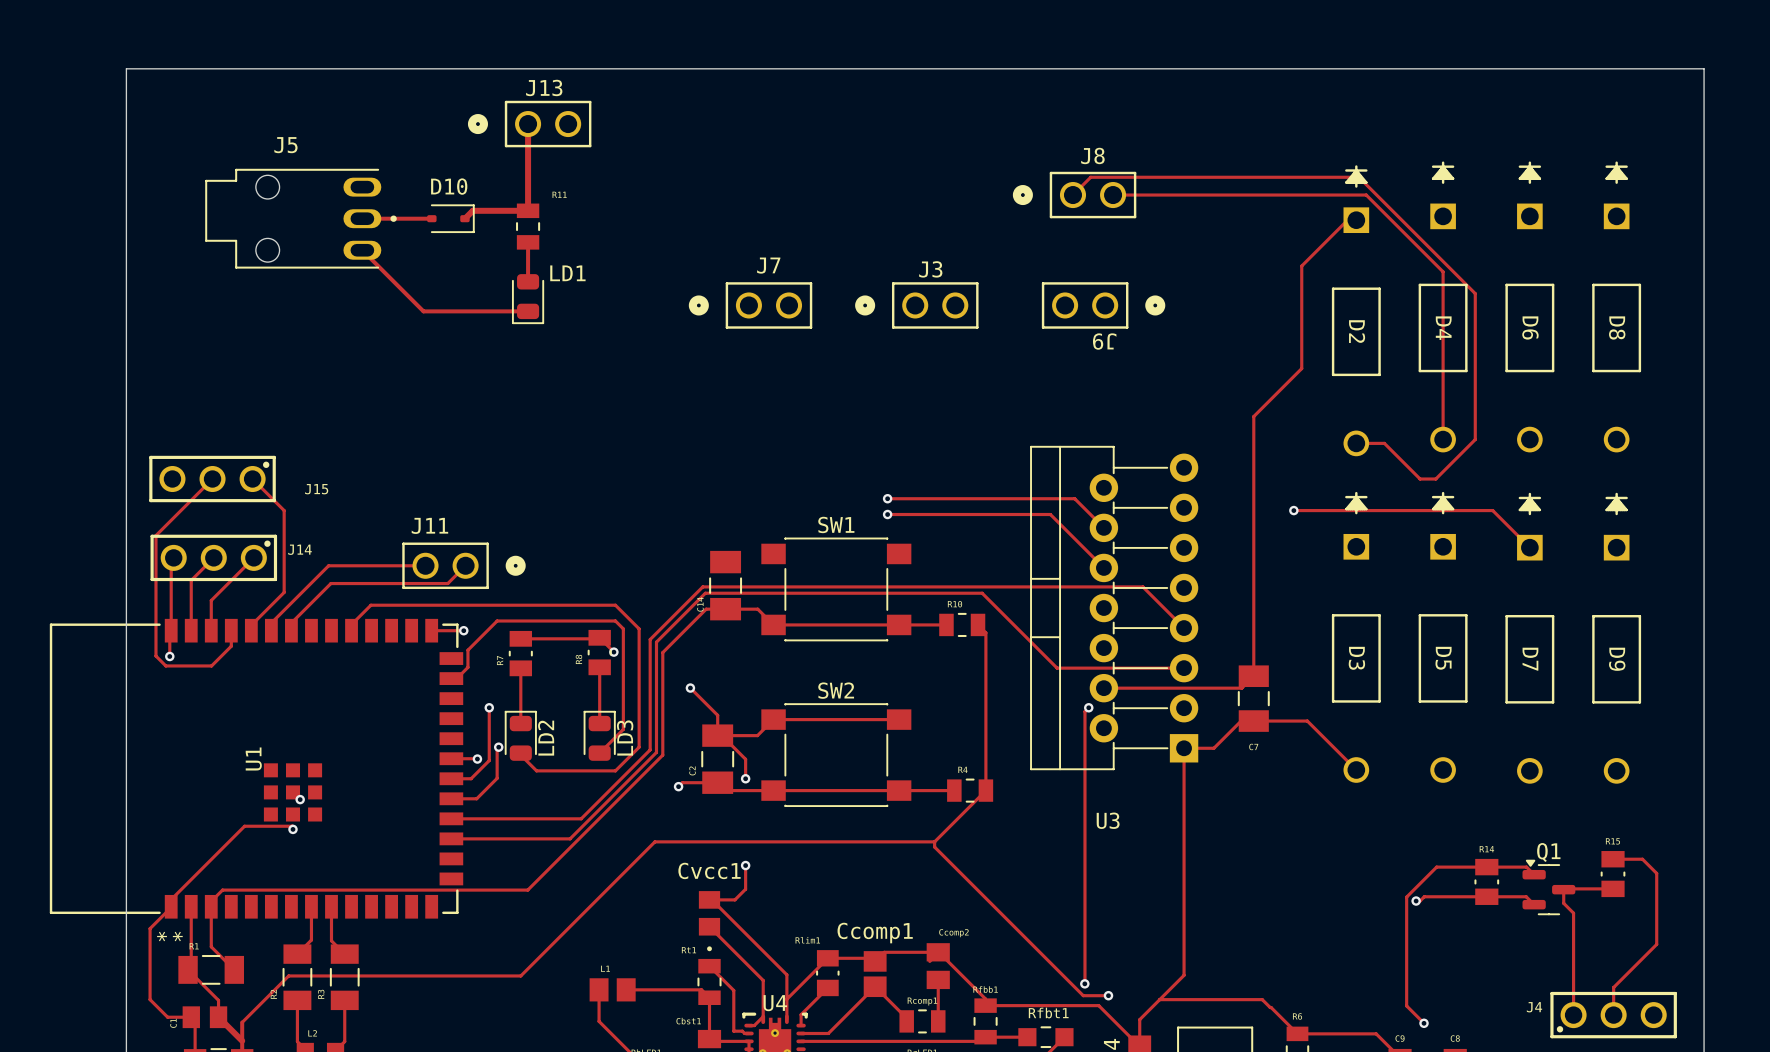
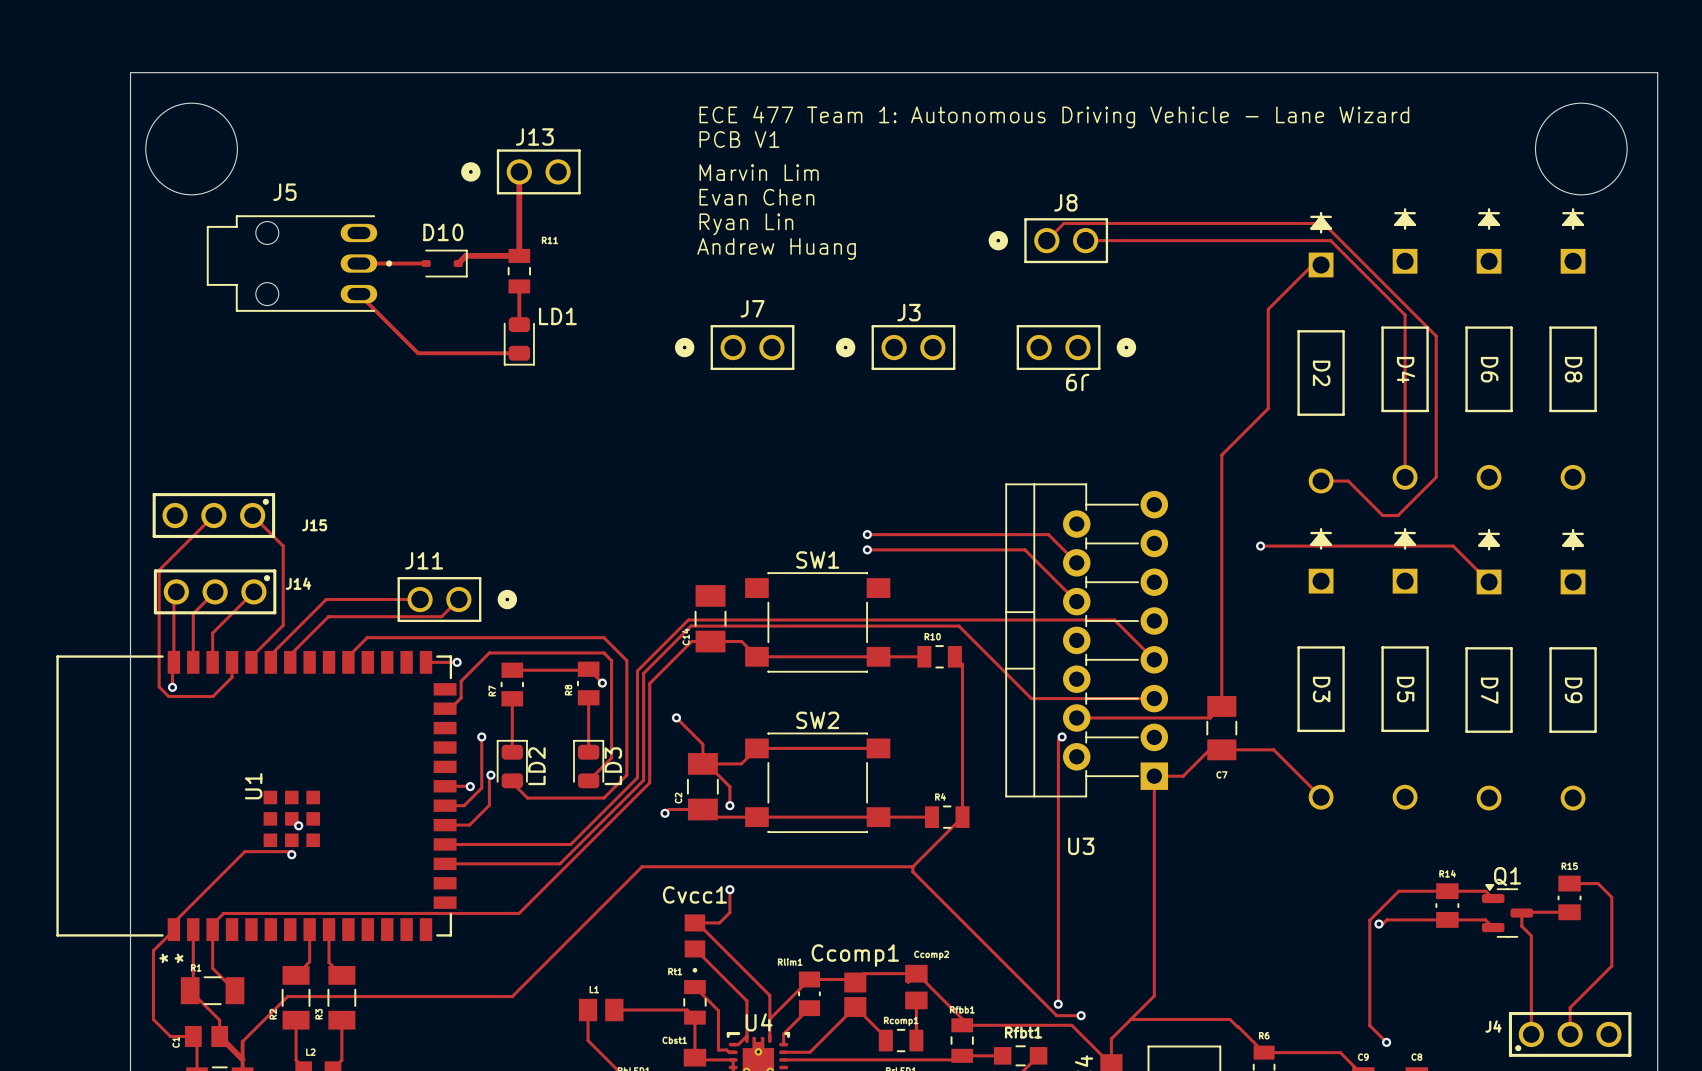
round board edge: none -> [145, 102, 238, 196]
round board edge: none -> [1535, 102, 1628, 196]
text: none -> ECE 477 Team 1: Autonomous Driving Vehicle - Lane Wizard (1054, 117)
board edge: (126, 68) (1704, 68) -> (130, 118) (130, 72) (1657, 72) (1657, 118)
text: none -> PCB V1 (739, 139)
text: none -> Marvin Lim (759, 172)
text: none -> Evan Chen (756, 197)
text: none -> Ryan Lin (746, 224)
text: none -> Andrew Huang (776, 248)

